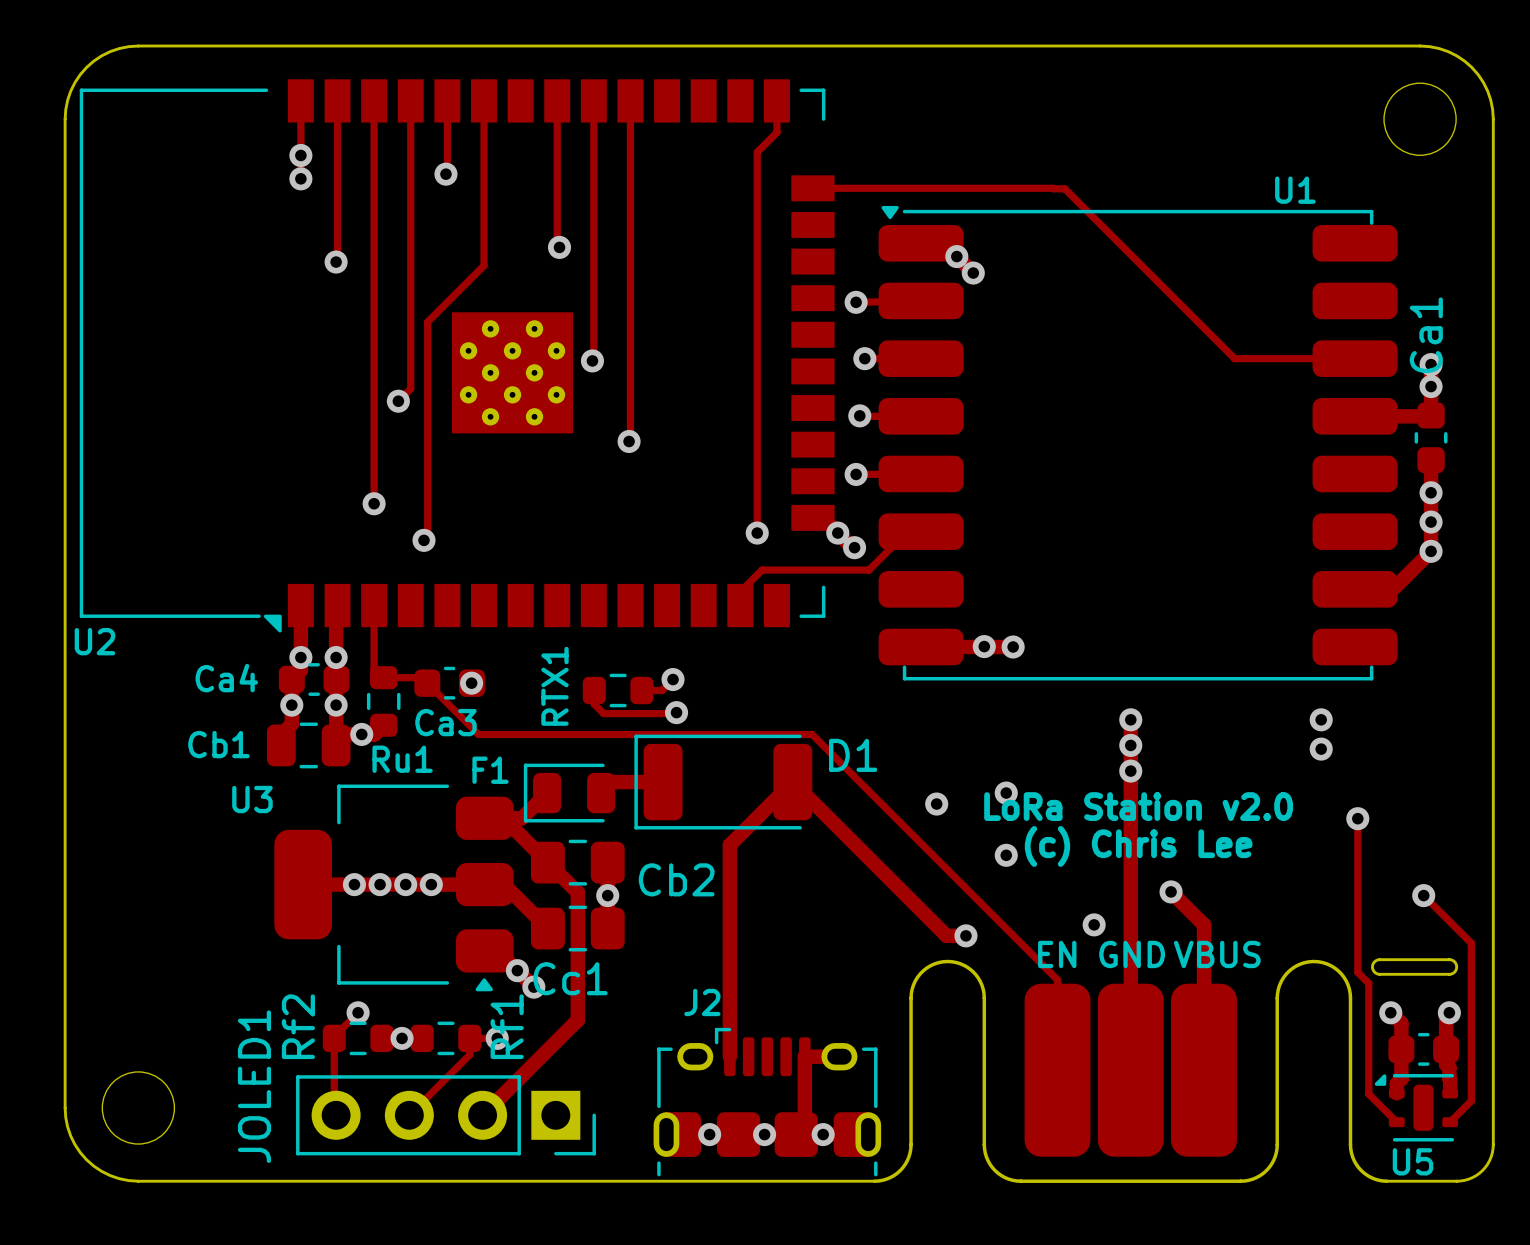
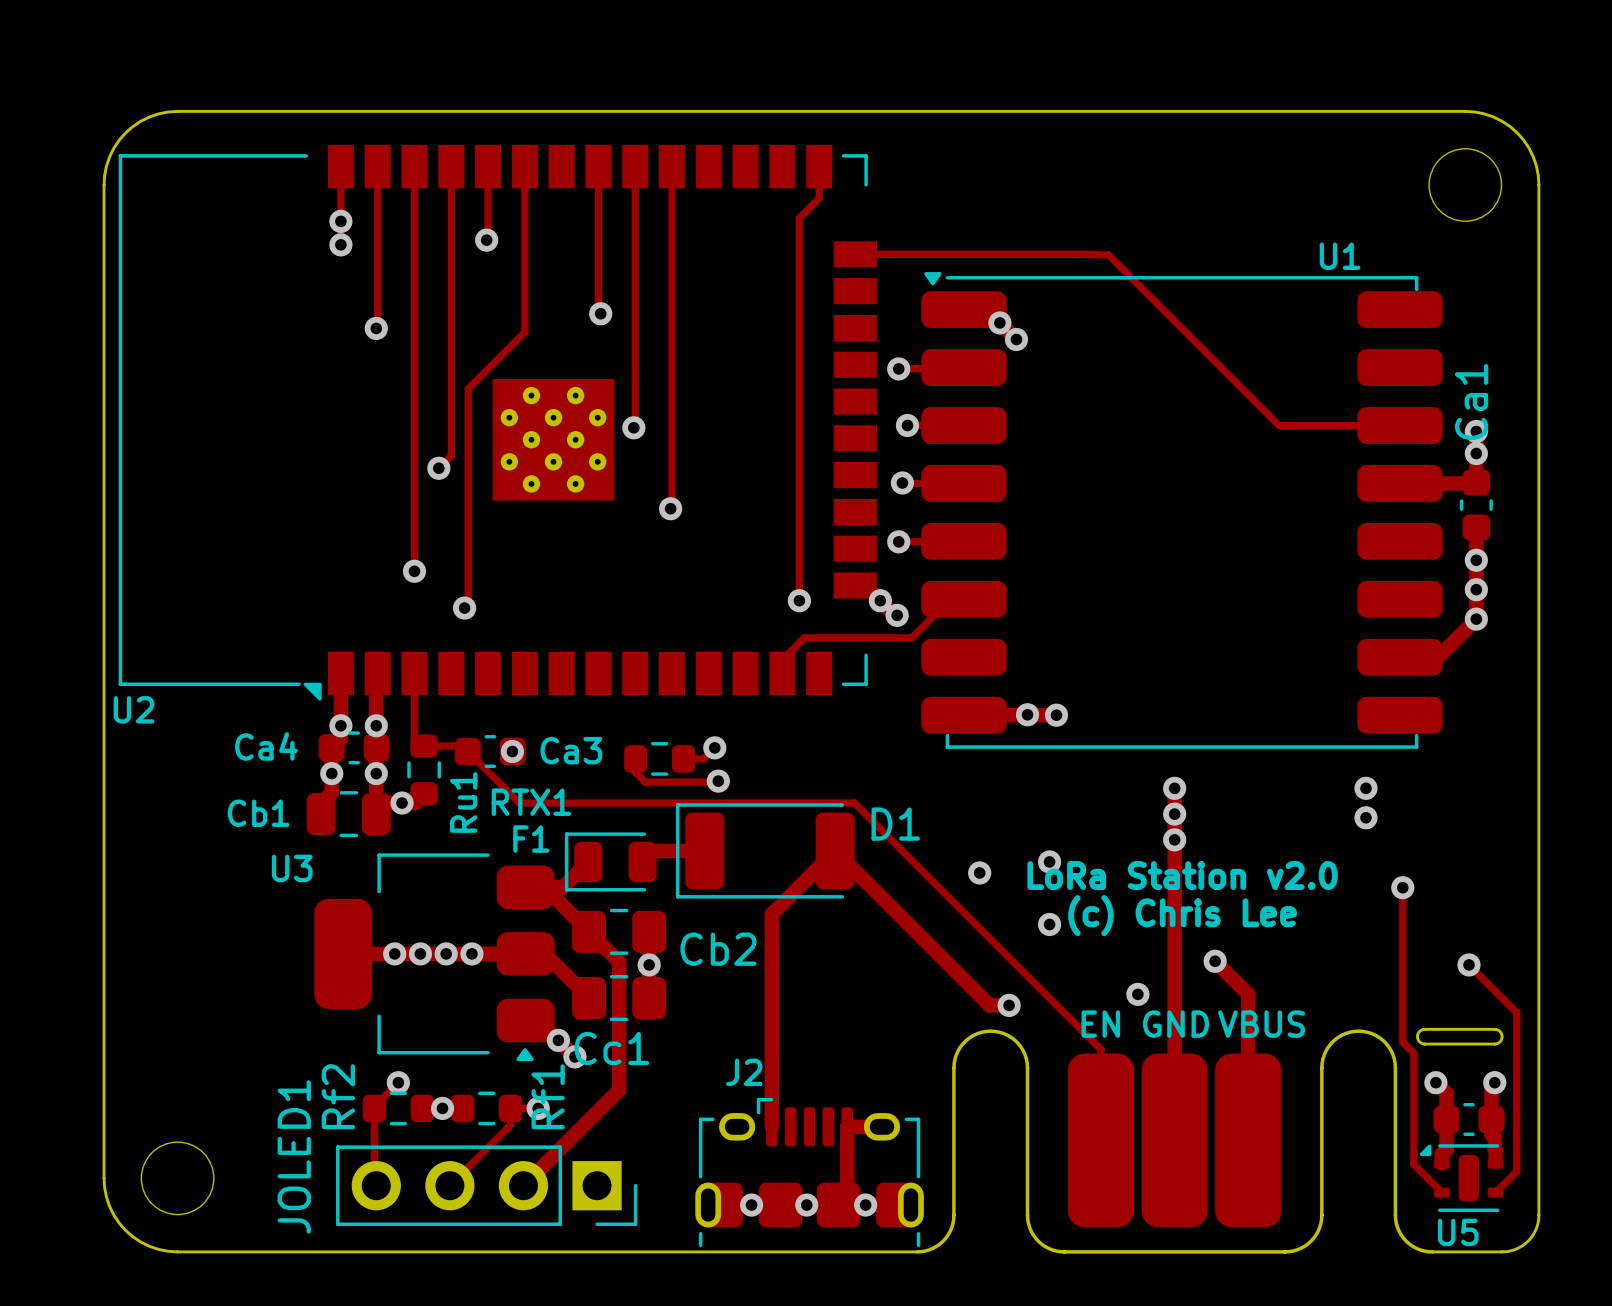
RTX1 name rotation: 0° (554, 686) -> 90° clockwise (531, 802)
Ca3 name position: Ca3 (445, 722) -> Ca3 (571, 750)
Ru1 name rotation: 0° (402, 759) -> 90° counterclockwise (463, 802)

